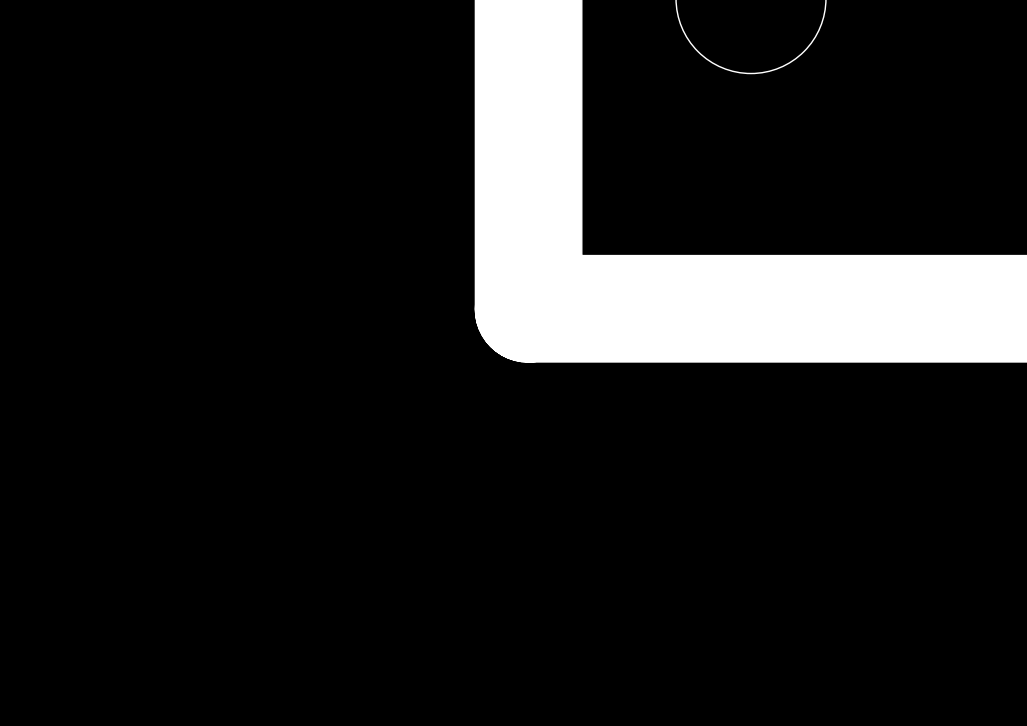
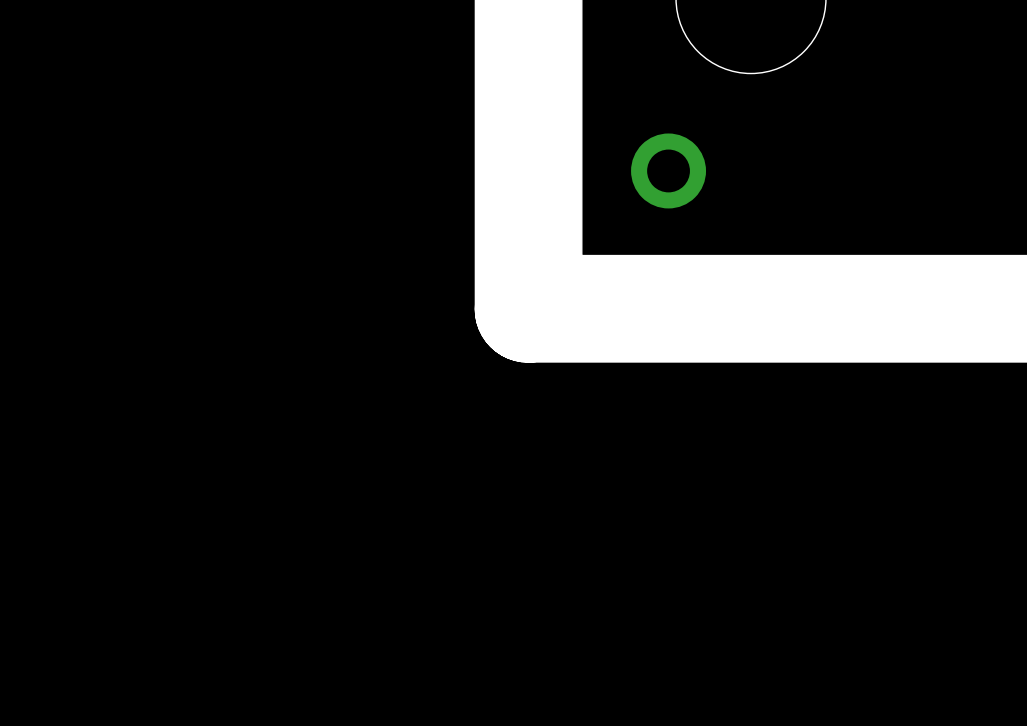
via: none -> (668, 170)

